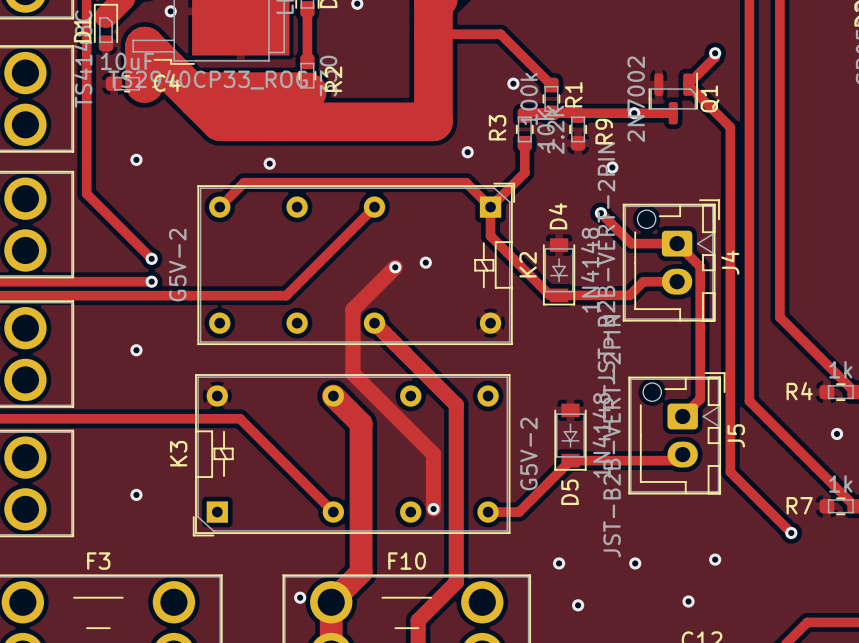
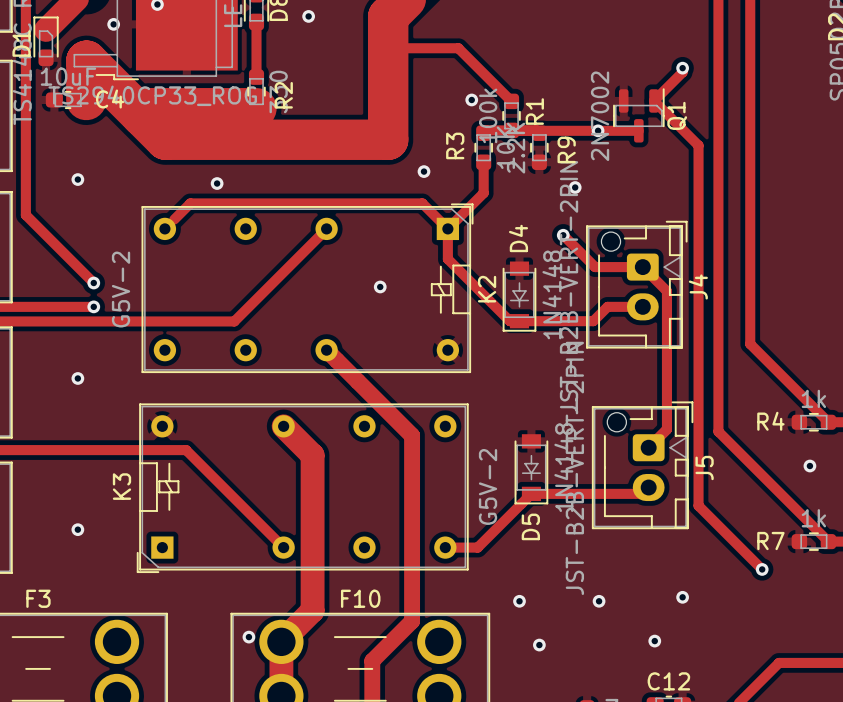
track: (395, 267) (352, 309) (352, 373) (433, 454) (433, 509) -> none
via: (395, 267) -> none
via: (433, 509) -> none

